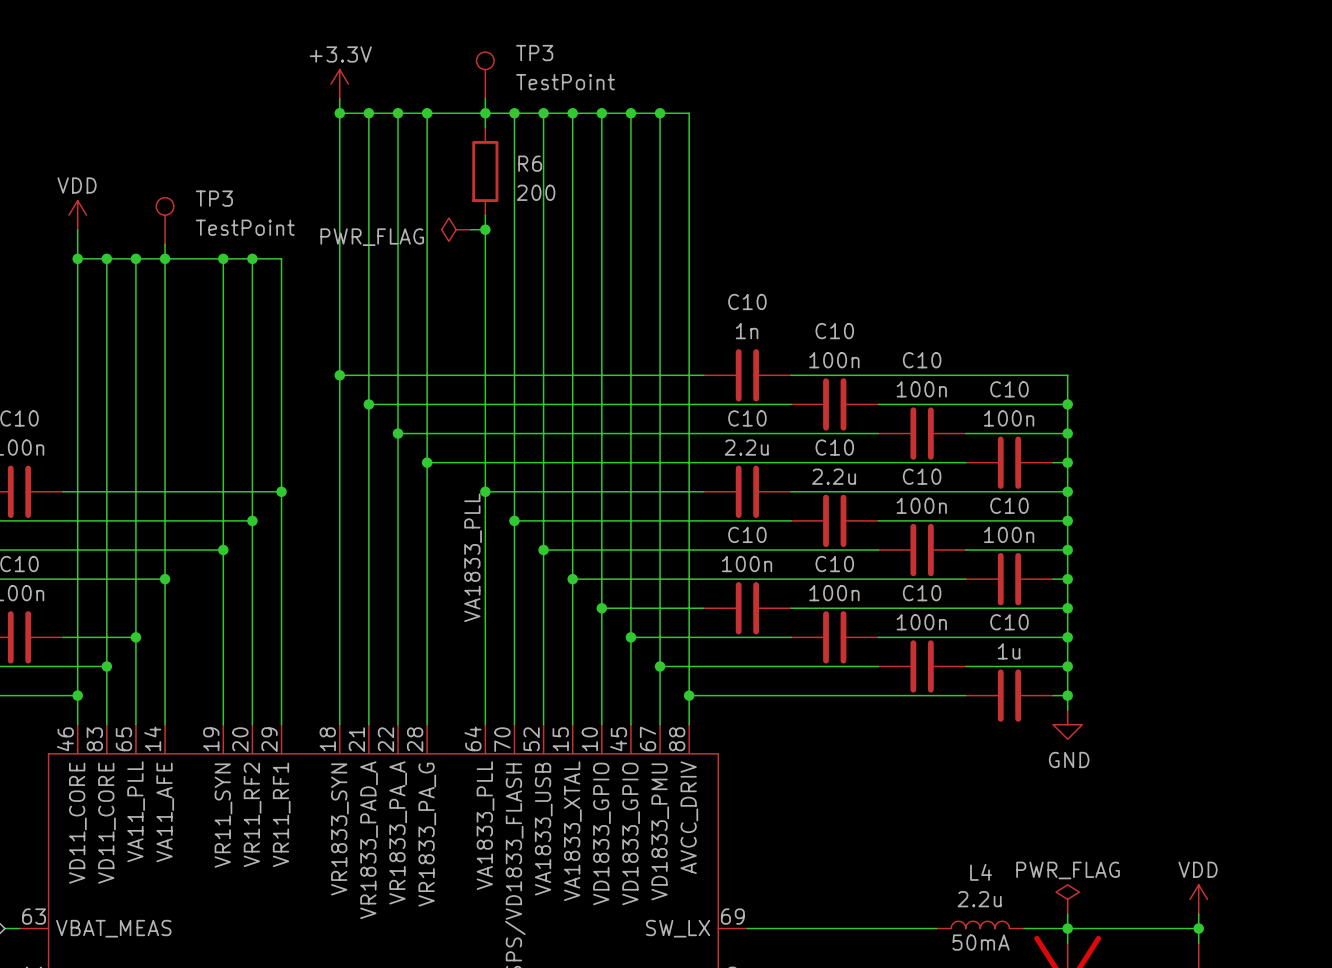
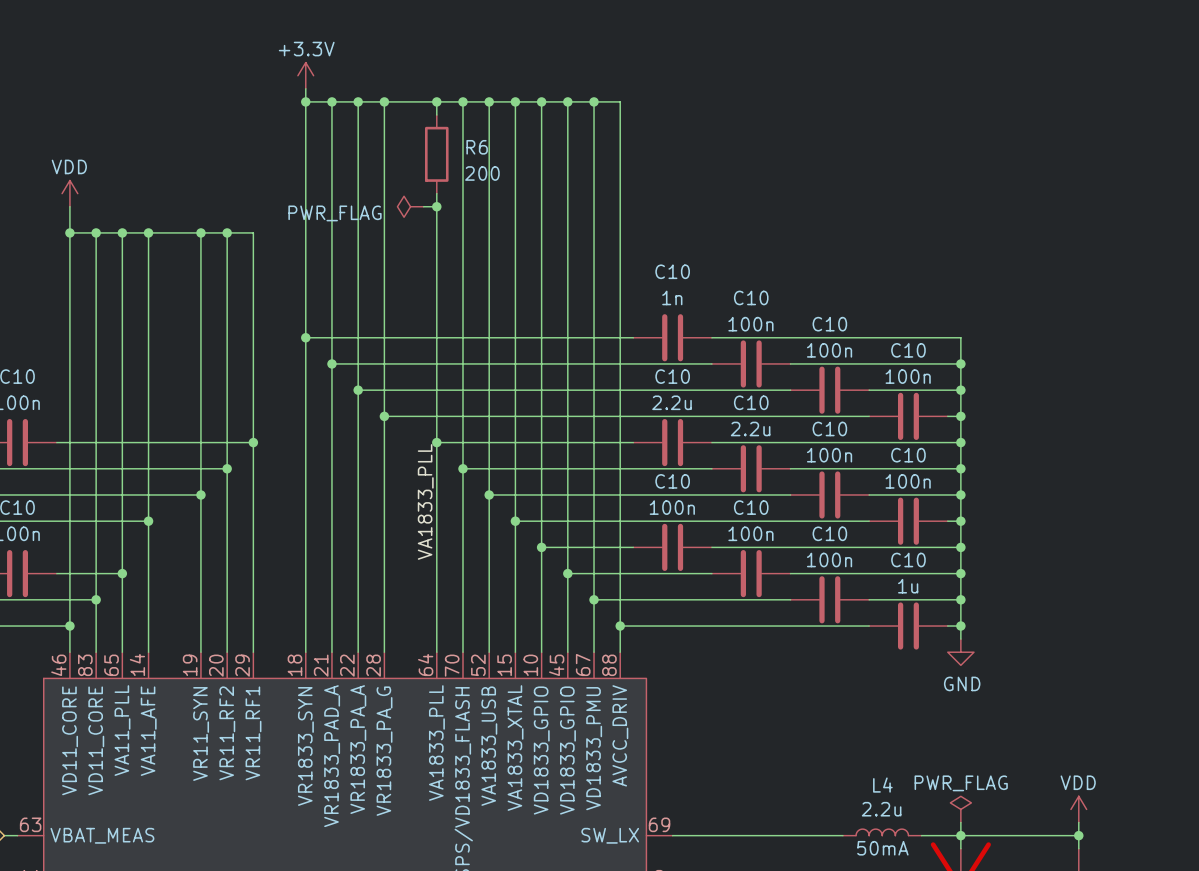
TP3: TestPoint (485, 75) -> none
wire: (485, 98) (485, 113) -> none
TP3: TestPoint (165, 220) -> none
wire: (165, 244) (165, 258) -> none

